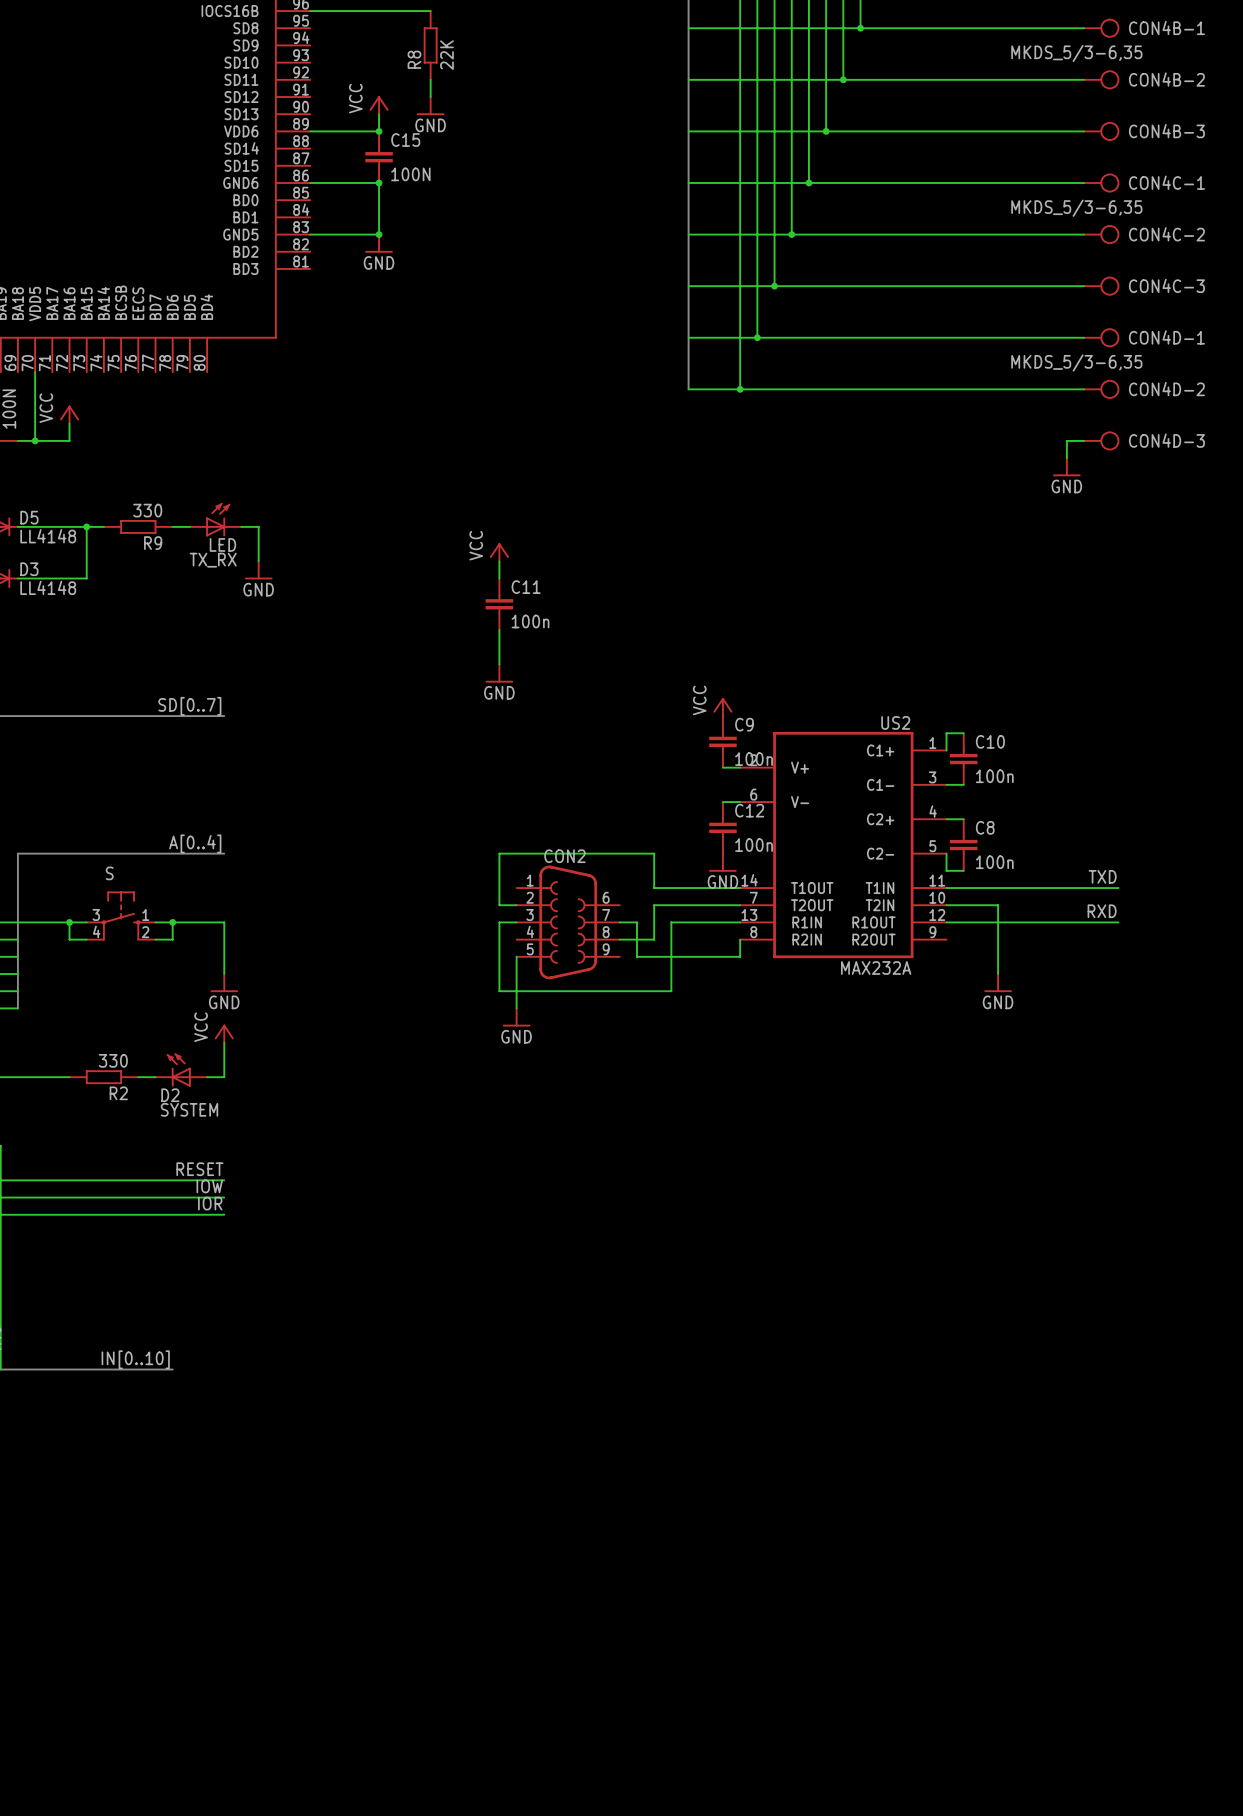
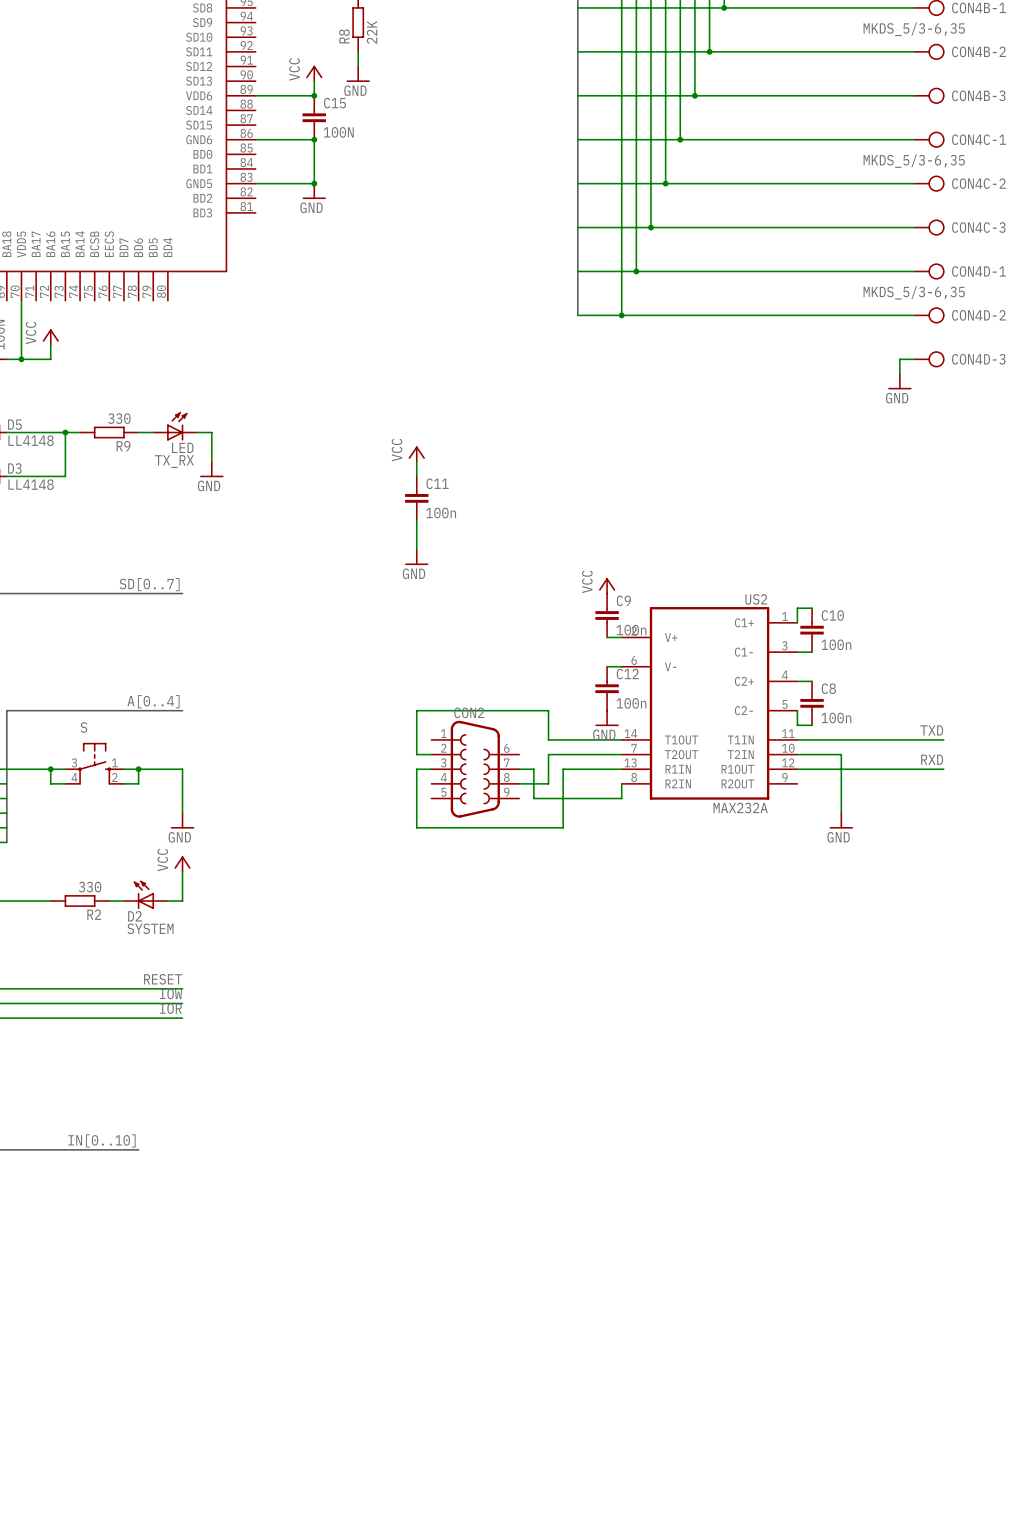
wire: (516, 956) (516, 1008) -> none
power symbol: GND (516, 1017) -> none

